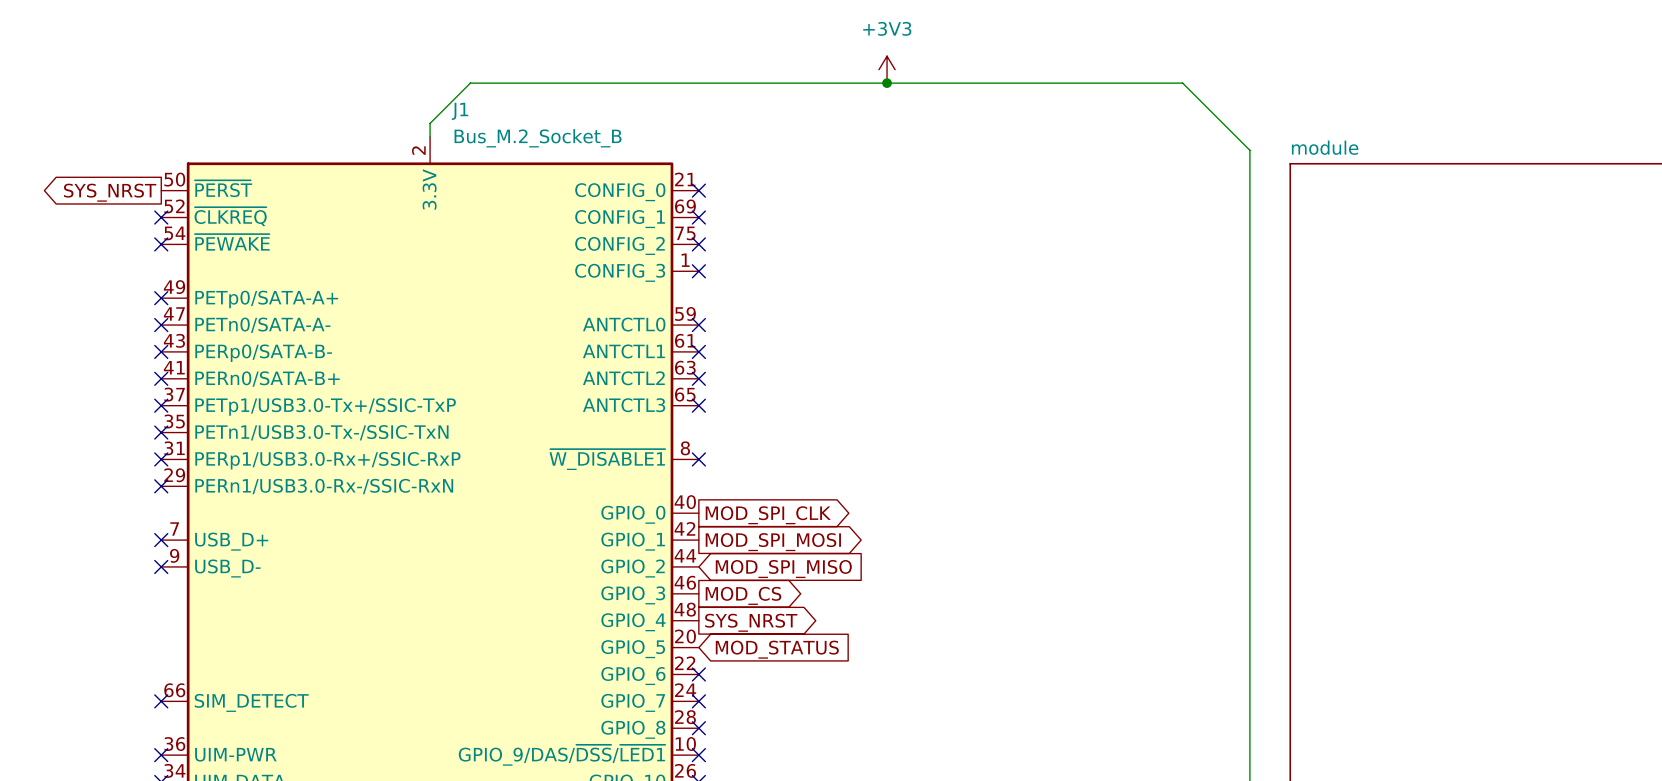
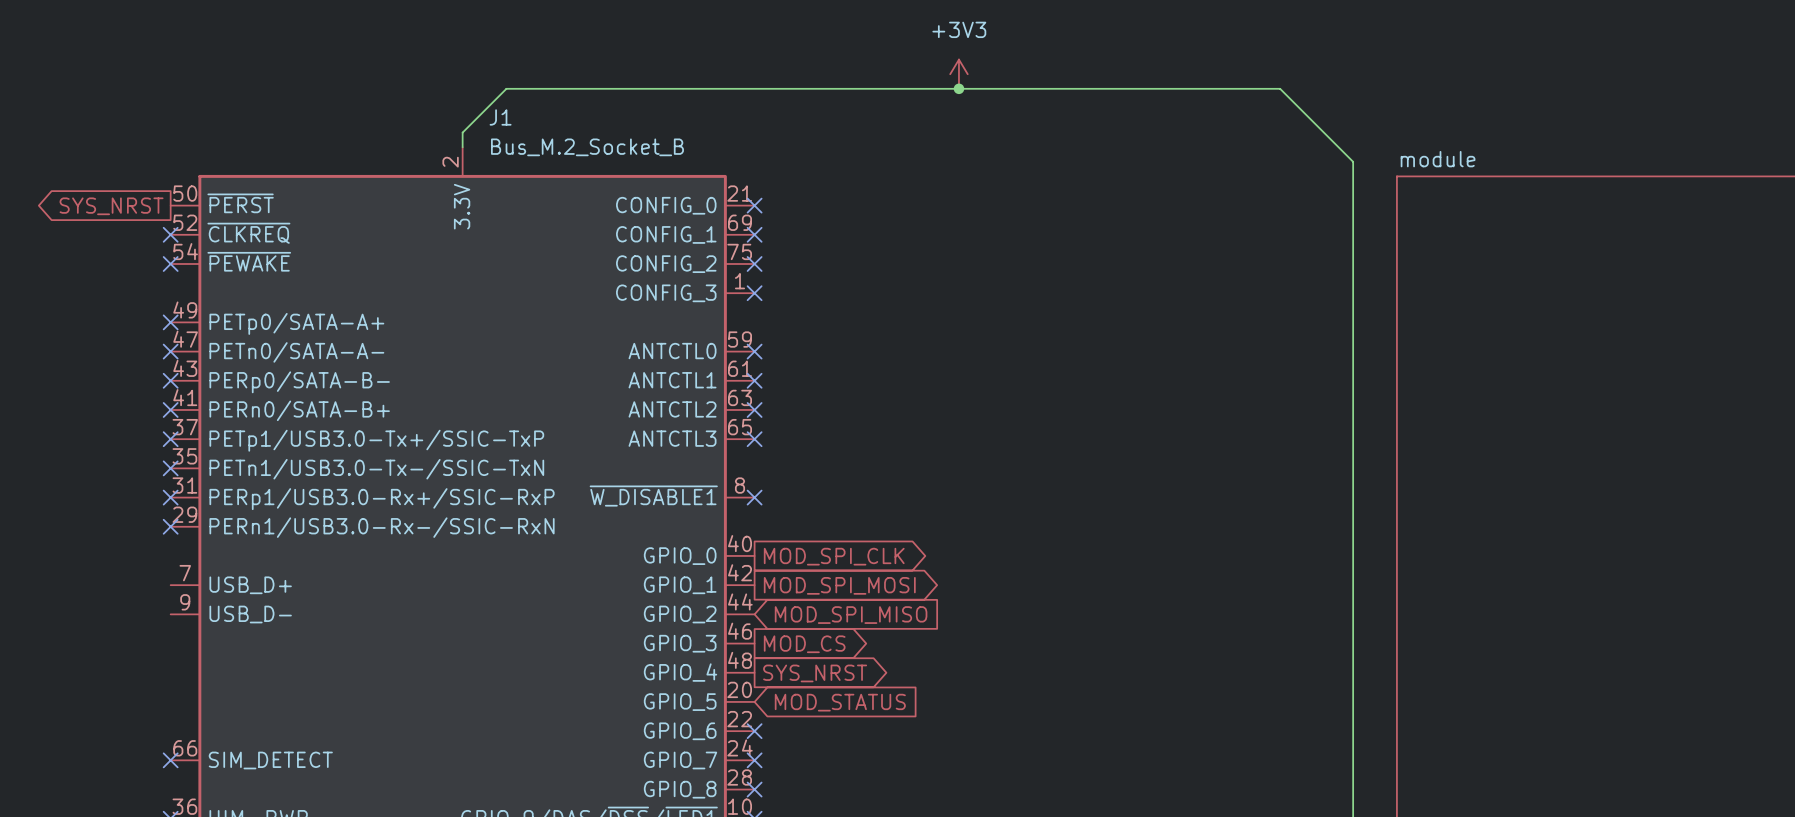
no-connect mark: (161, 540) -> none
no-connect mark: (161, 566) -> none

